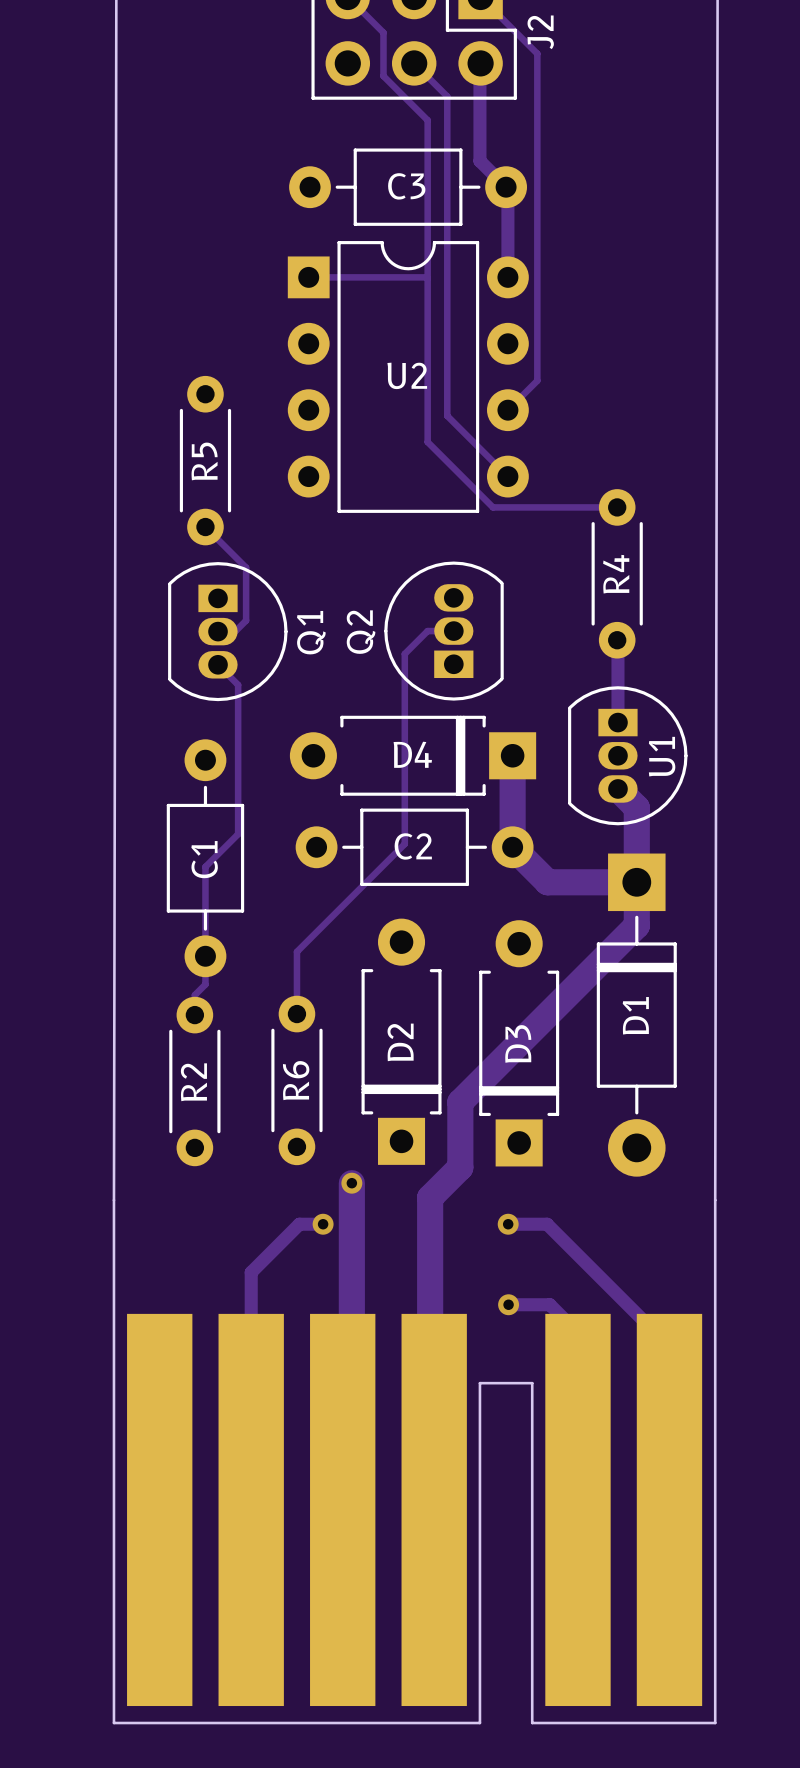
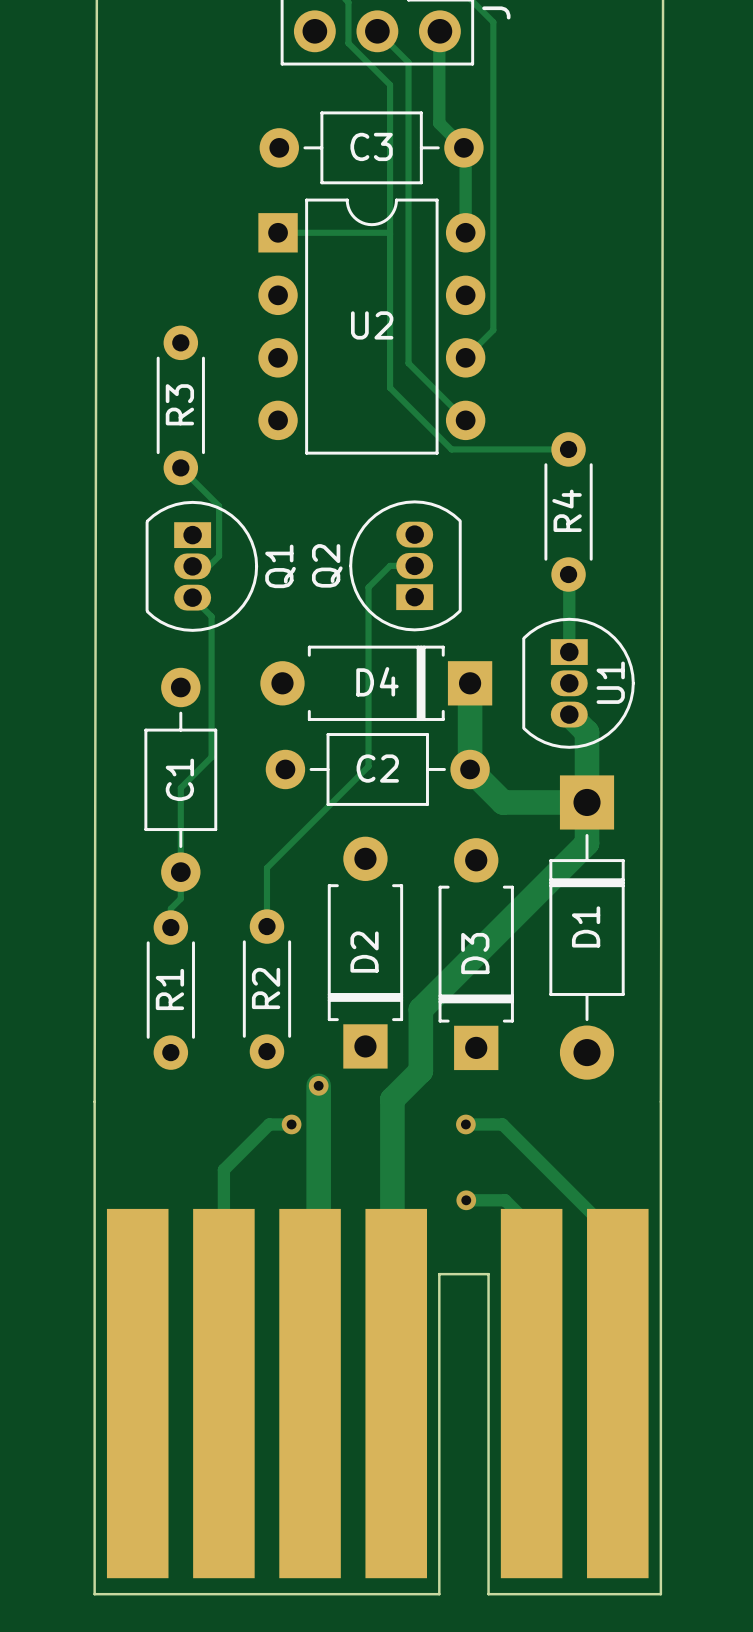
R5 name: R5 (204, 461) -> R3 (179, 404)
R6 name: R6 (296, 1080) -> R2 (266, 988)
R2 name: R2 (193, 1082) -> R1 (169, 989)

